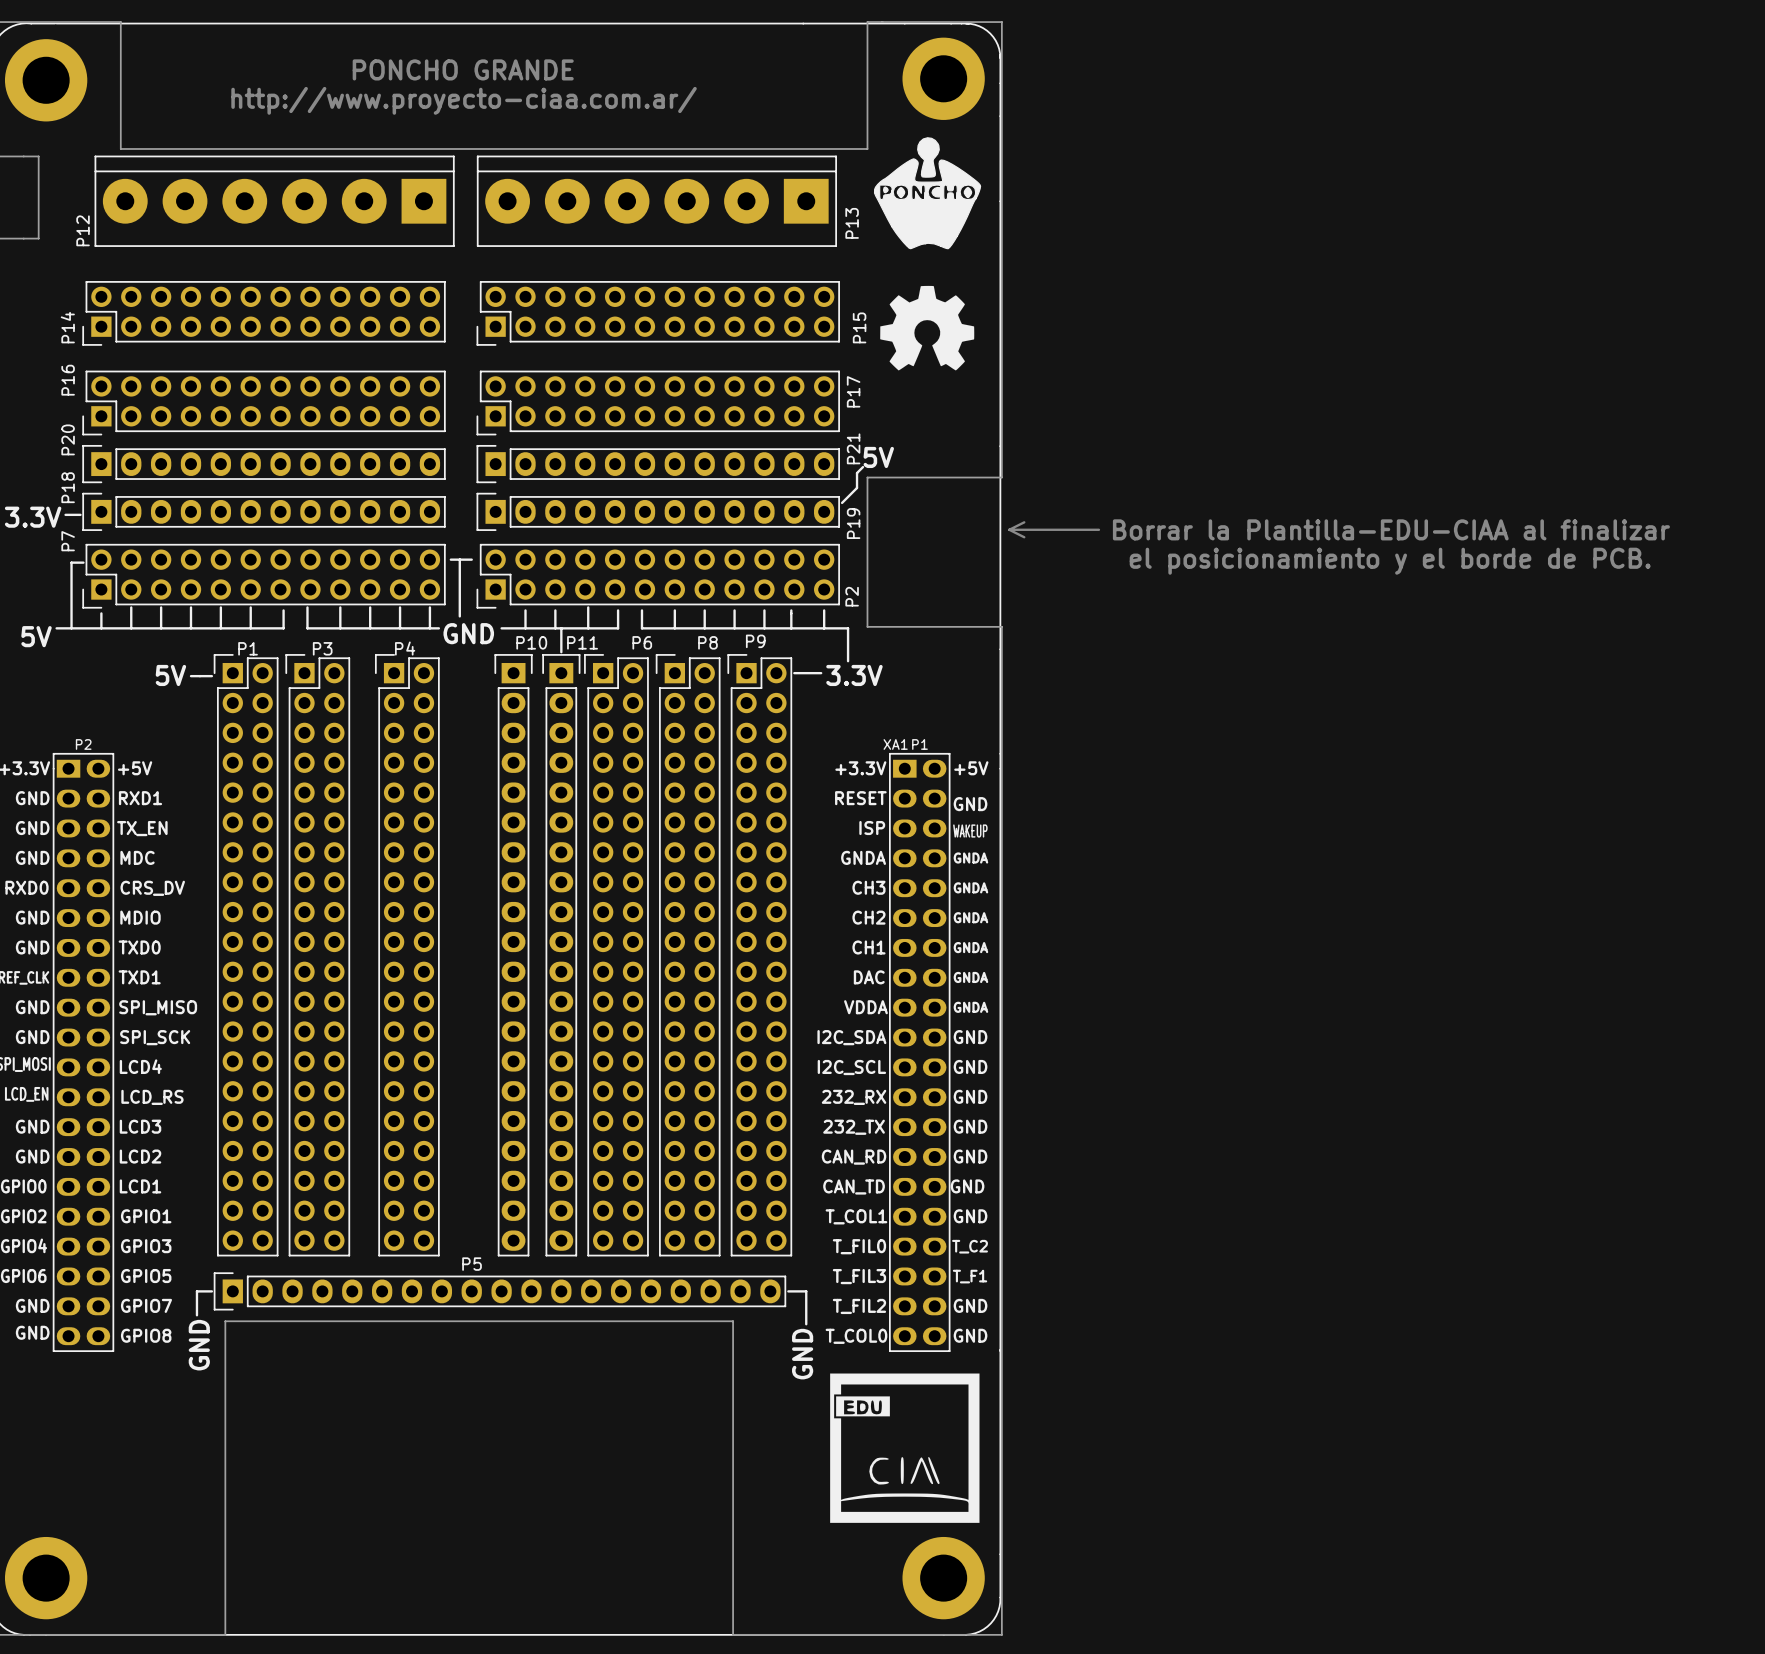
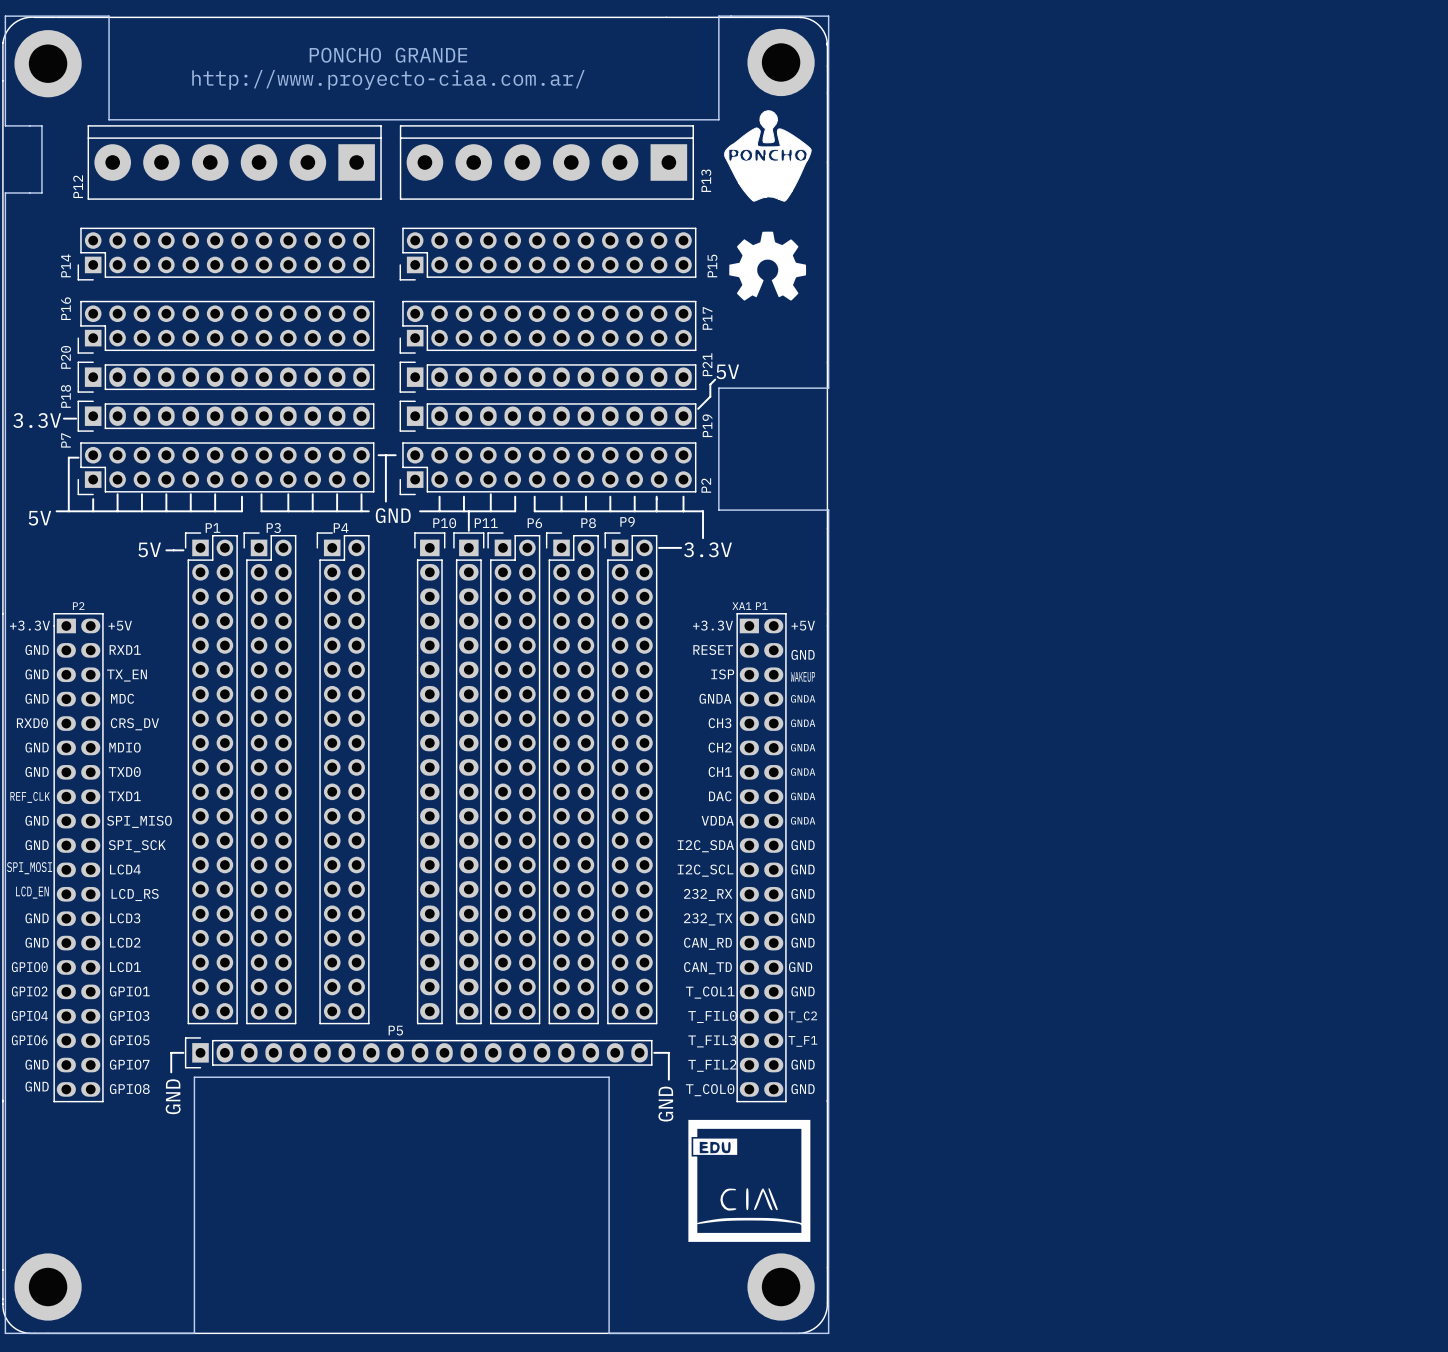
line: (1024, 522) (1009, 529) -> none
line: (1009, 529) (1024, 537) -> none
line: (1009, 529) (1098, 529) -> none
text: Borrar la Plantilla-EDU-CIAA al finalizar (1391, 529) -> none
text: el posicionamiento y el borde de PCB. (1390, 561) -> none

